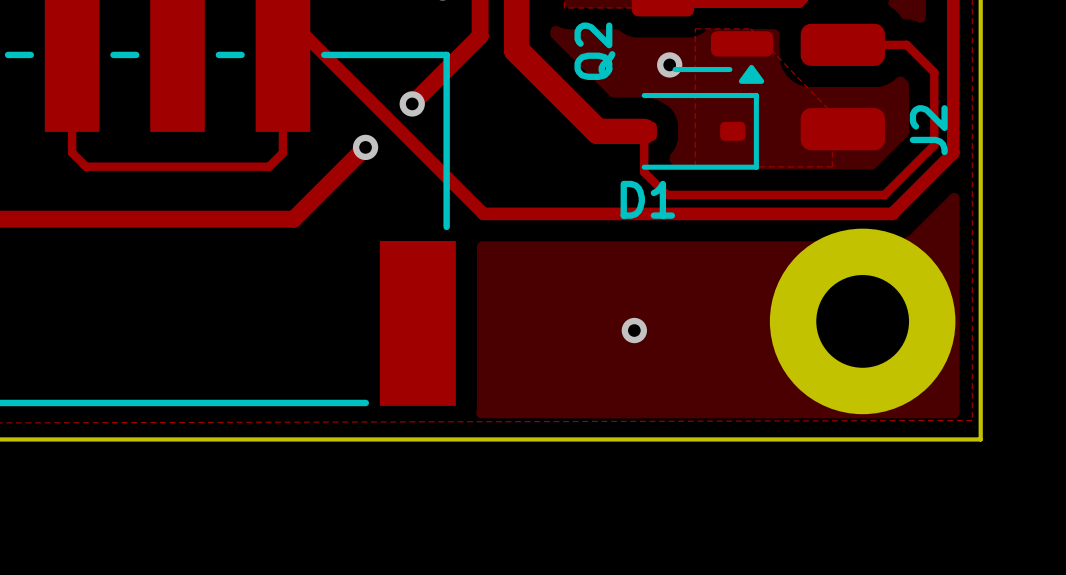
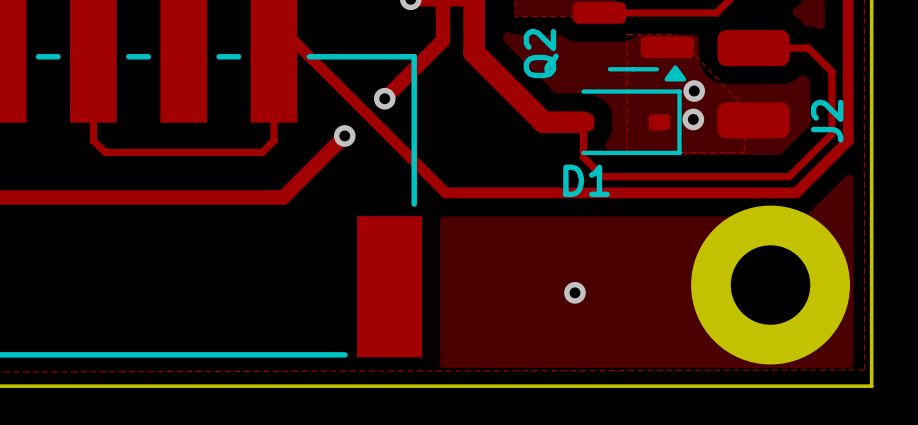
via: (669, 64) -> none
via: none -> (694, 91)
via: none -> (693, 119)

